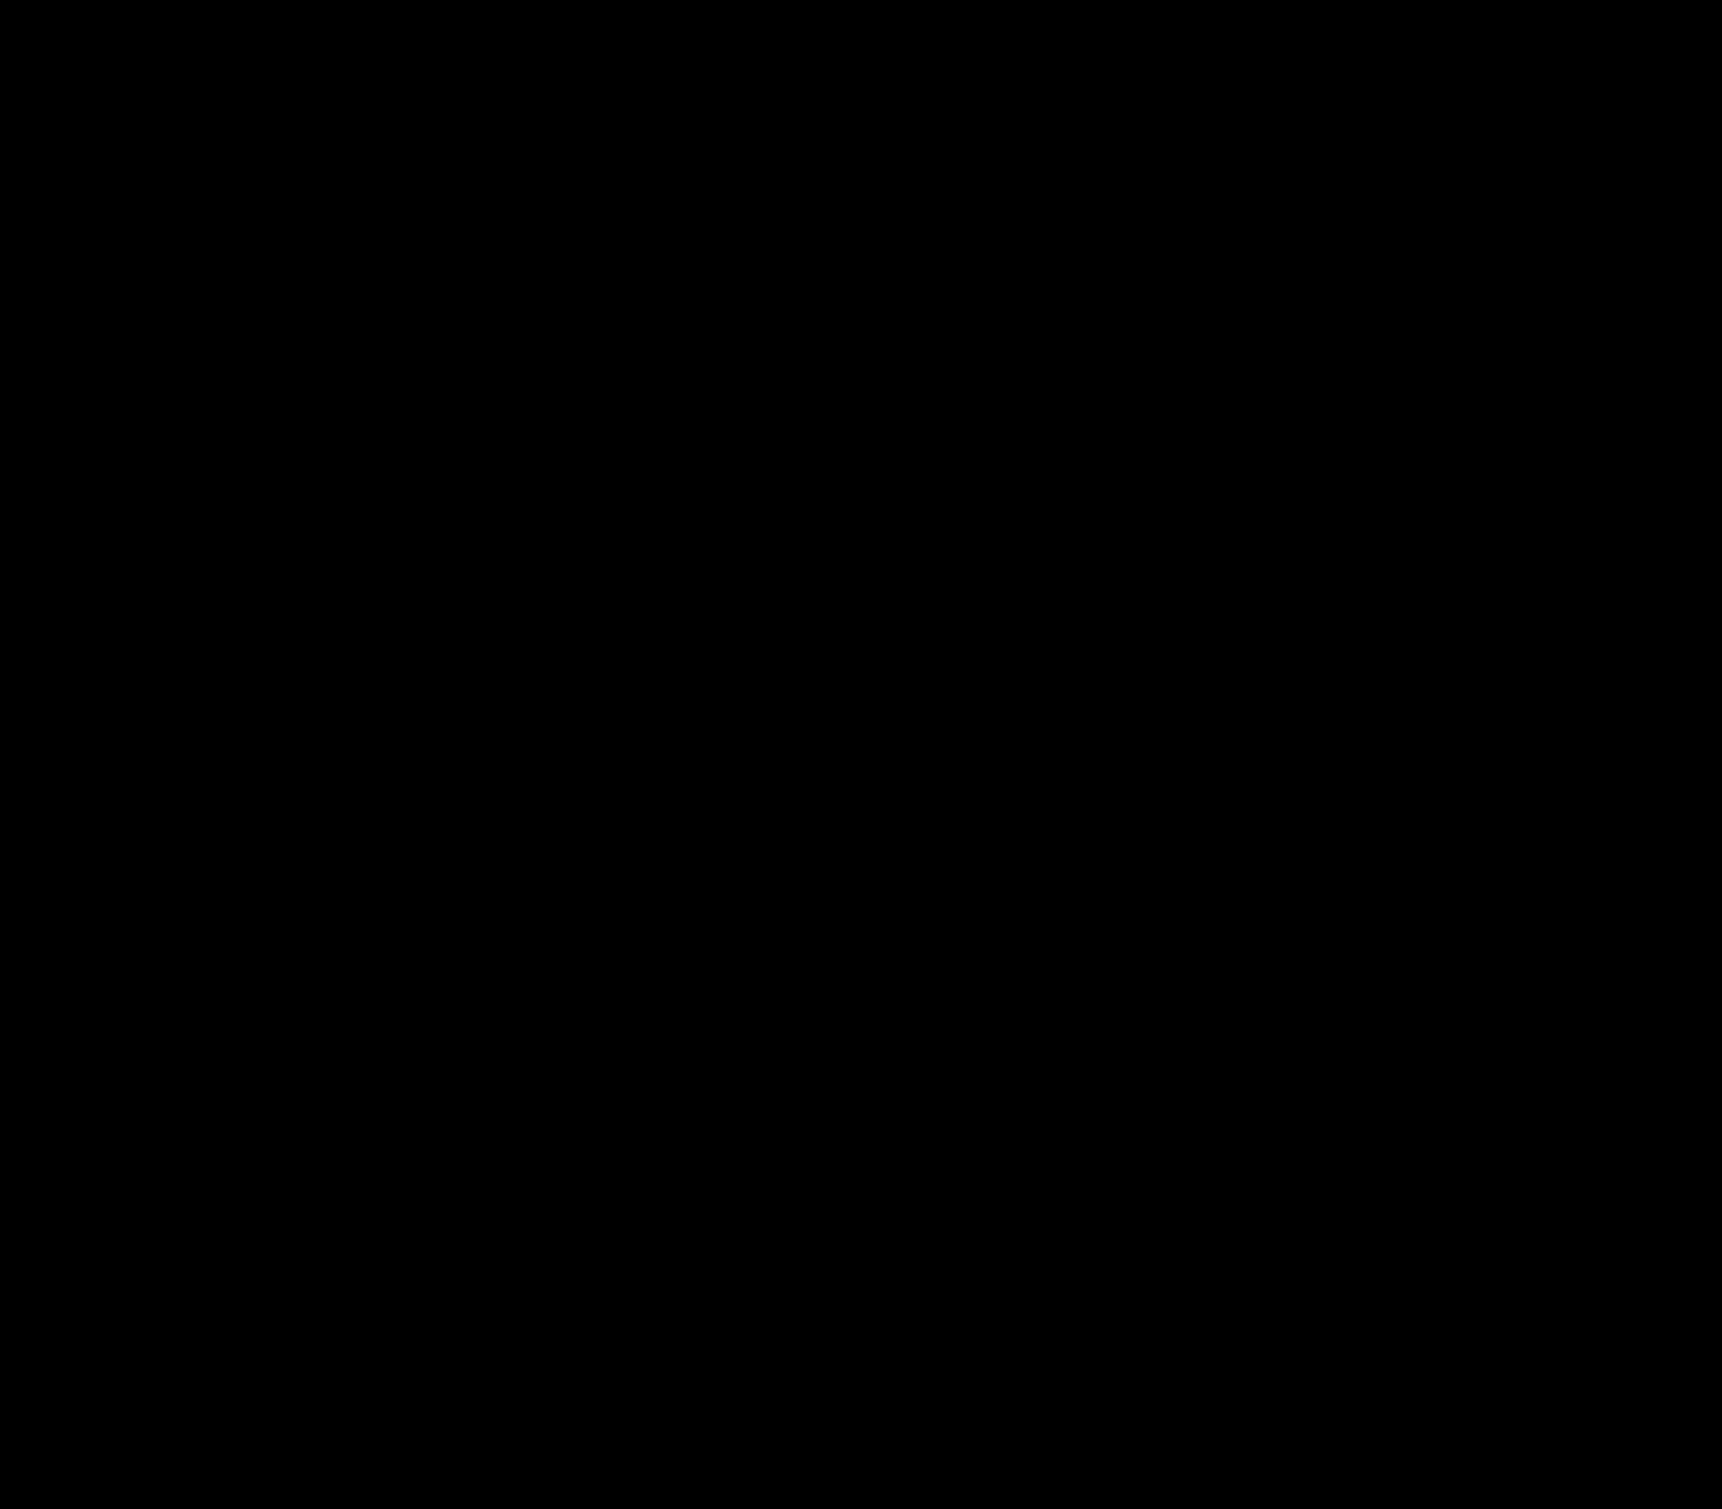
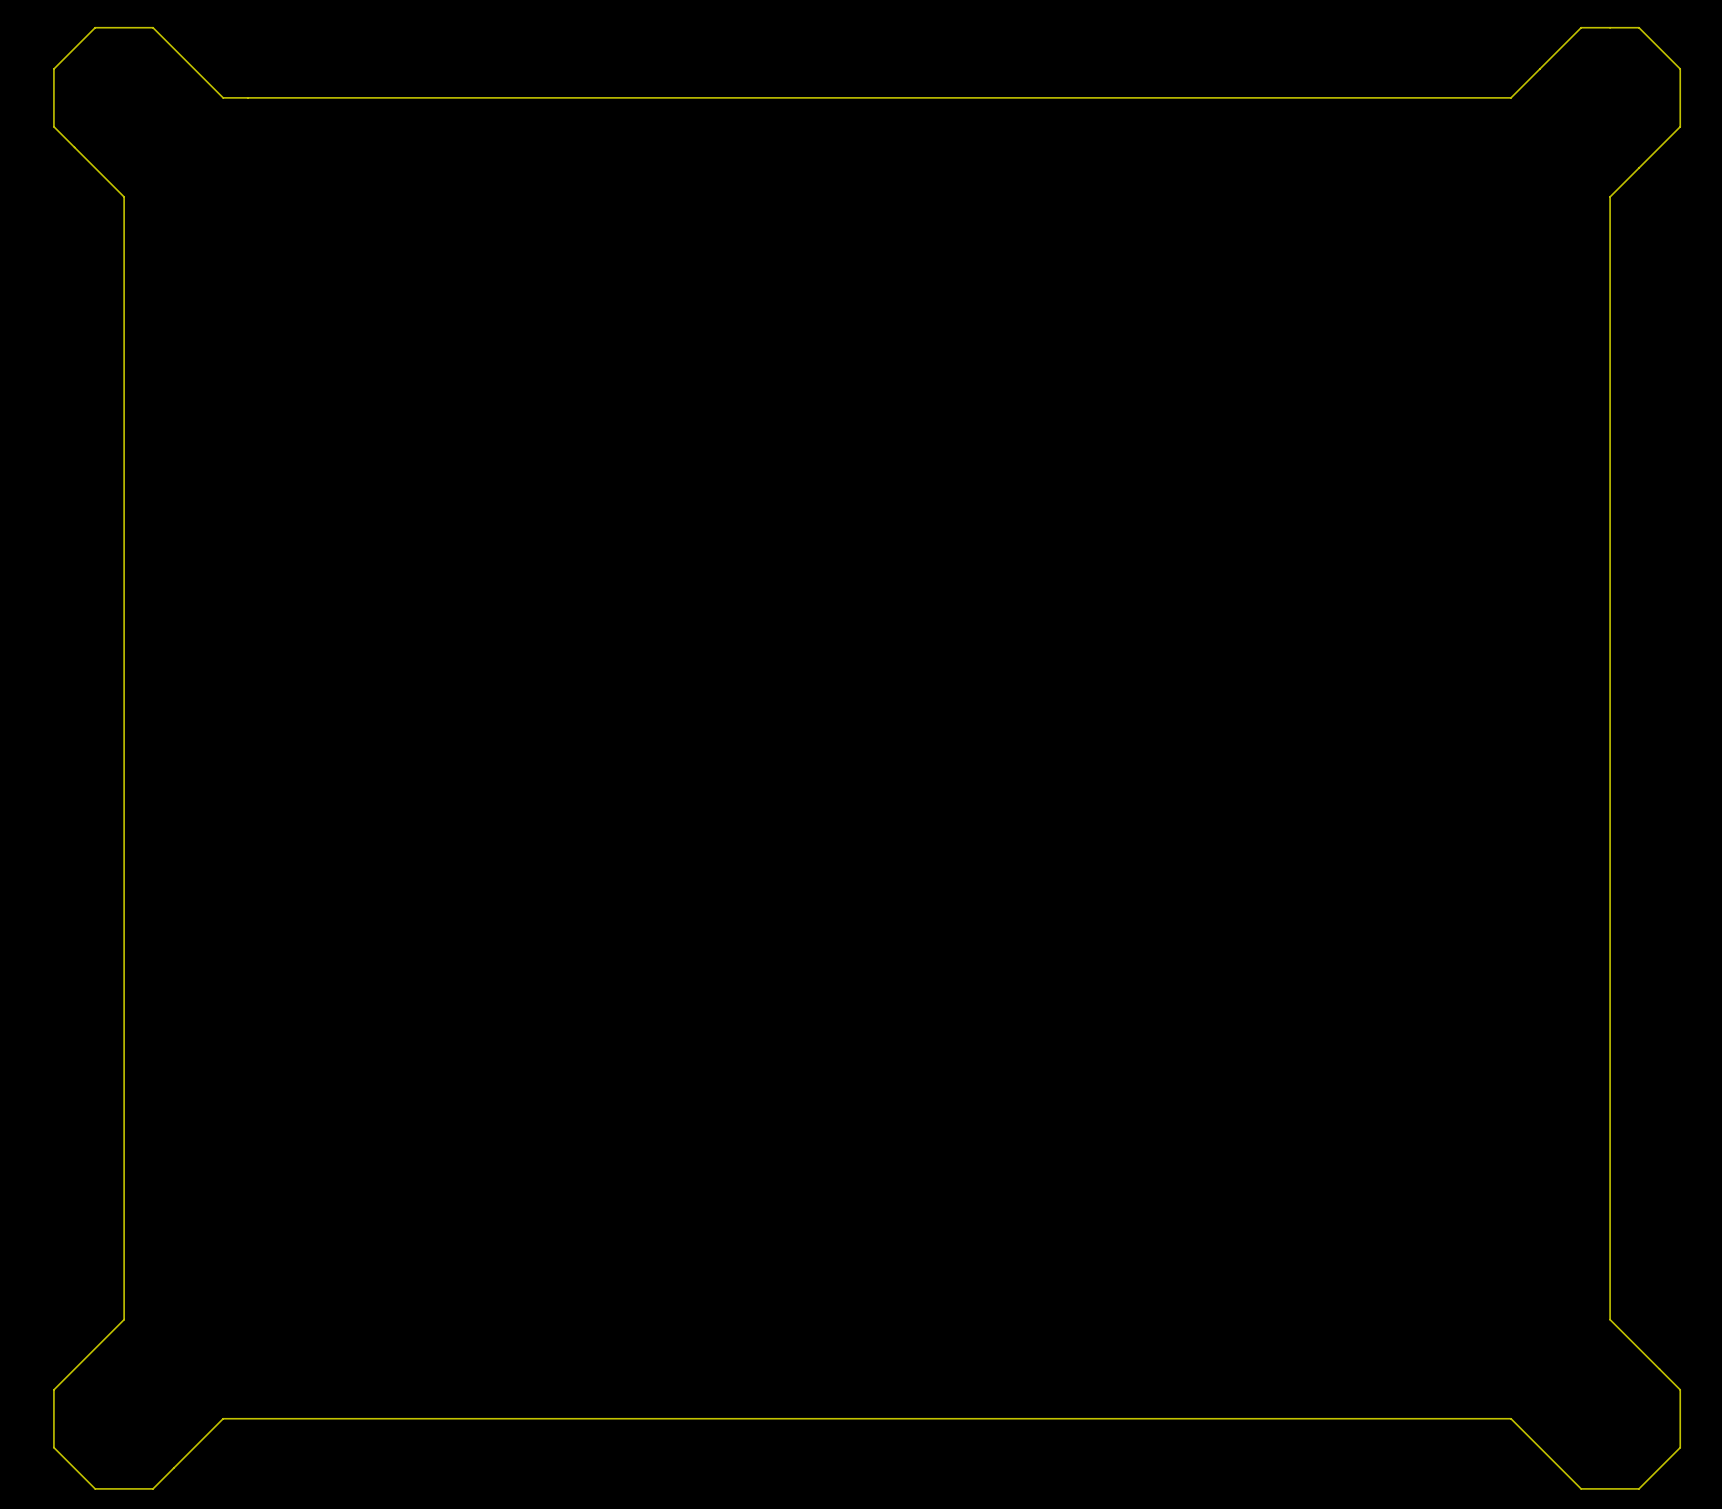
board edge: none -> (95, 27) (153, 27) (223, 97) (1511, 97) (1581, 27) (1638, 27) (1680, 68) (1680, 126) (1610, 196) (1610, 1319) (1680, 1389) (1680, 1447) (1638, 1488) (1581, 1488) (1511, 1418) (223, 1418) (153, 1488) (95, 1488) (53, 1447) (53, 1389) (124, 1319) (124, 196) (53, 126) (53, 68) (95, 27)

